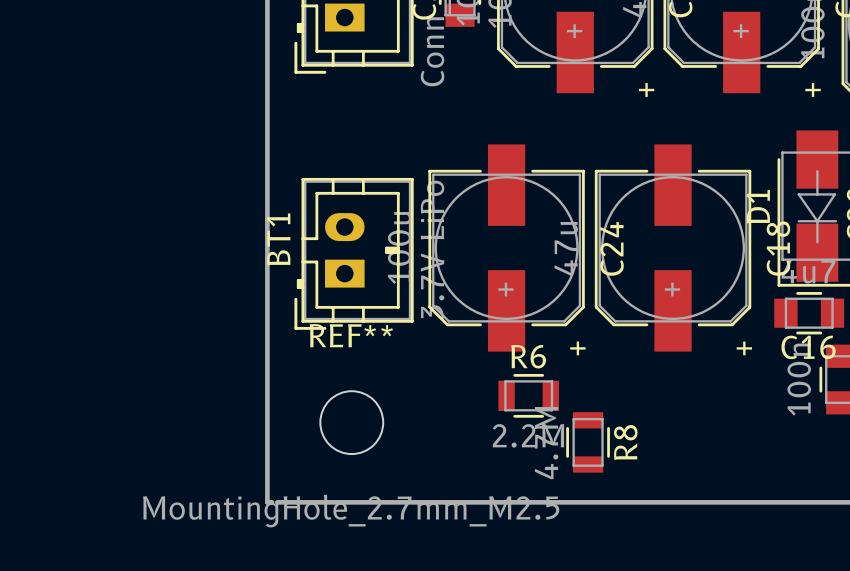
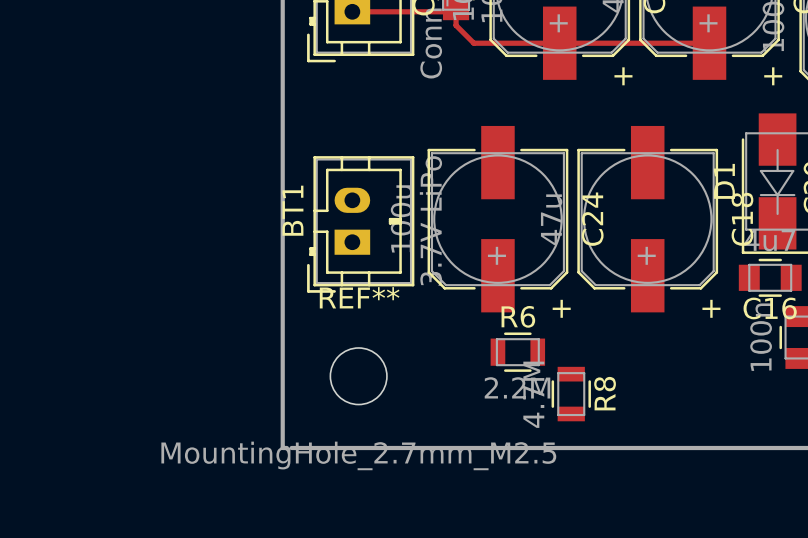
track: none -> (352, 11) (453, 11) (456, 9) (456, 25) (473, 43) (709, 43)

